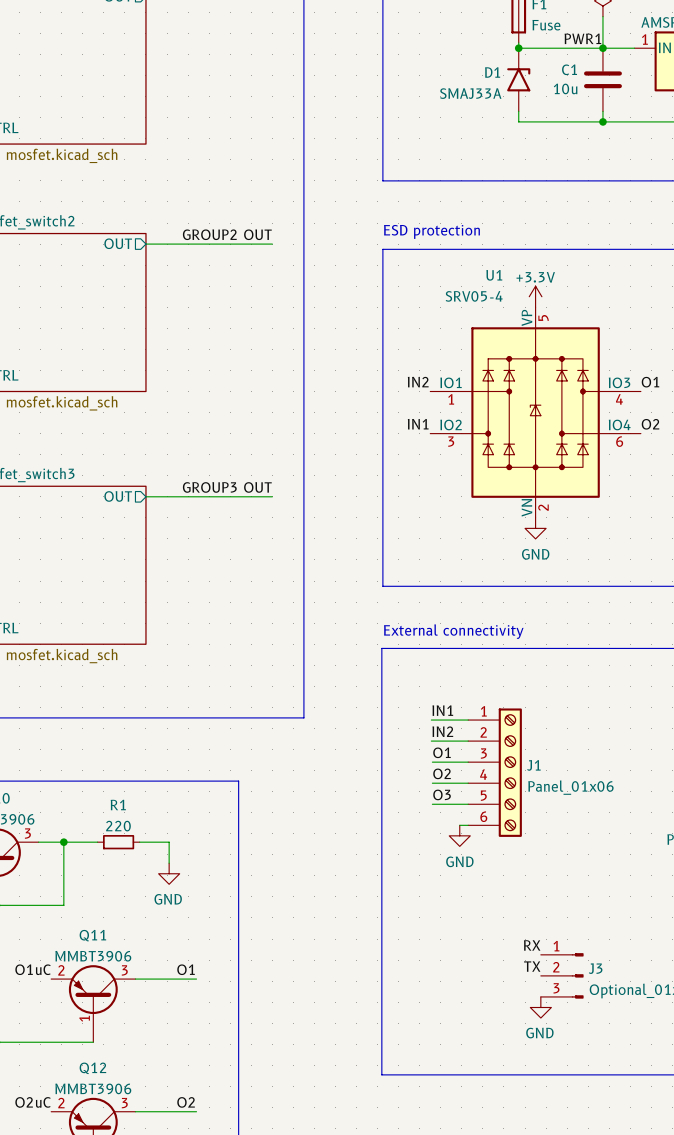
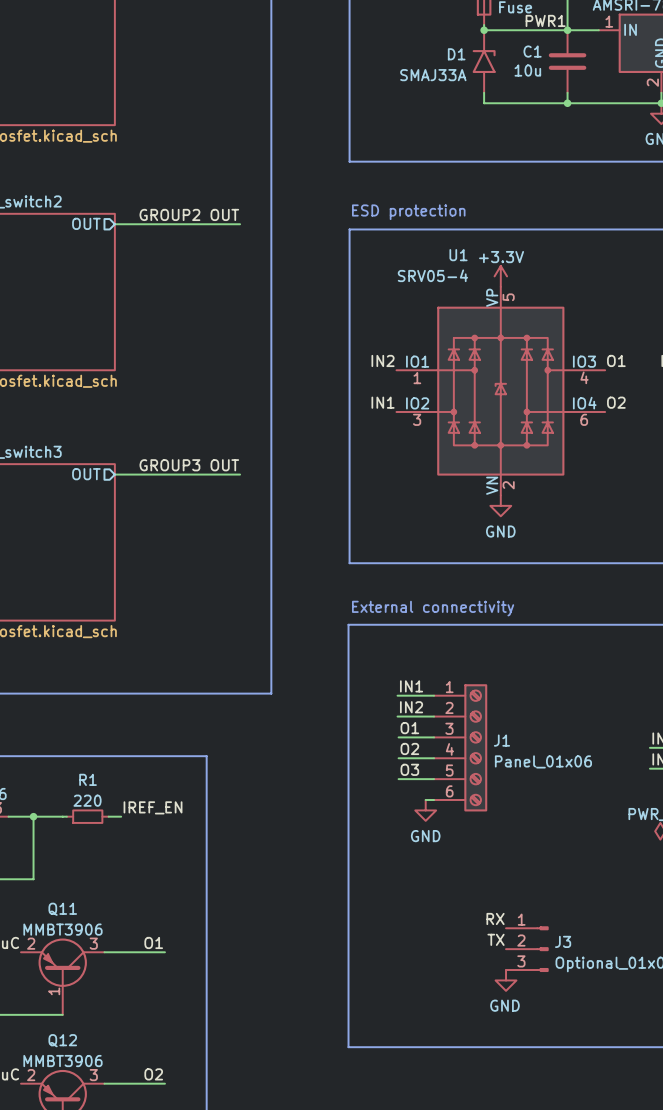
label: none -> IREF_EN (153, 807)
wire: (152, 842) (169, 842) (169, 863) -> none
power symbol: GND (169, 873) -> none

